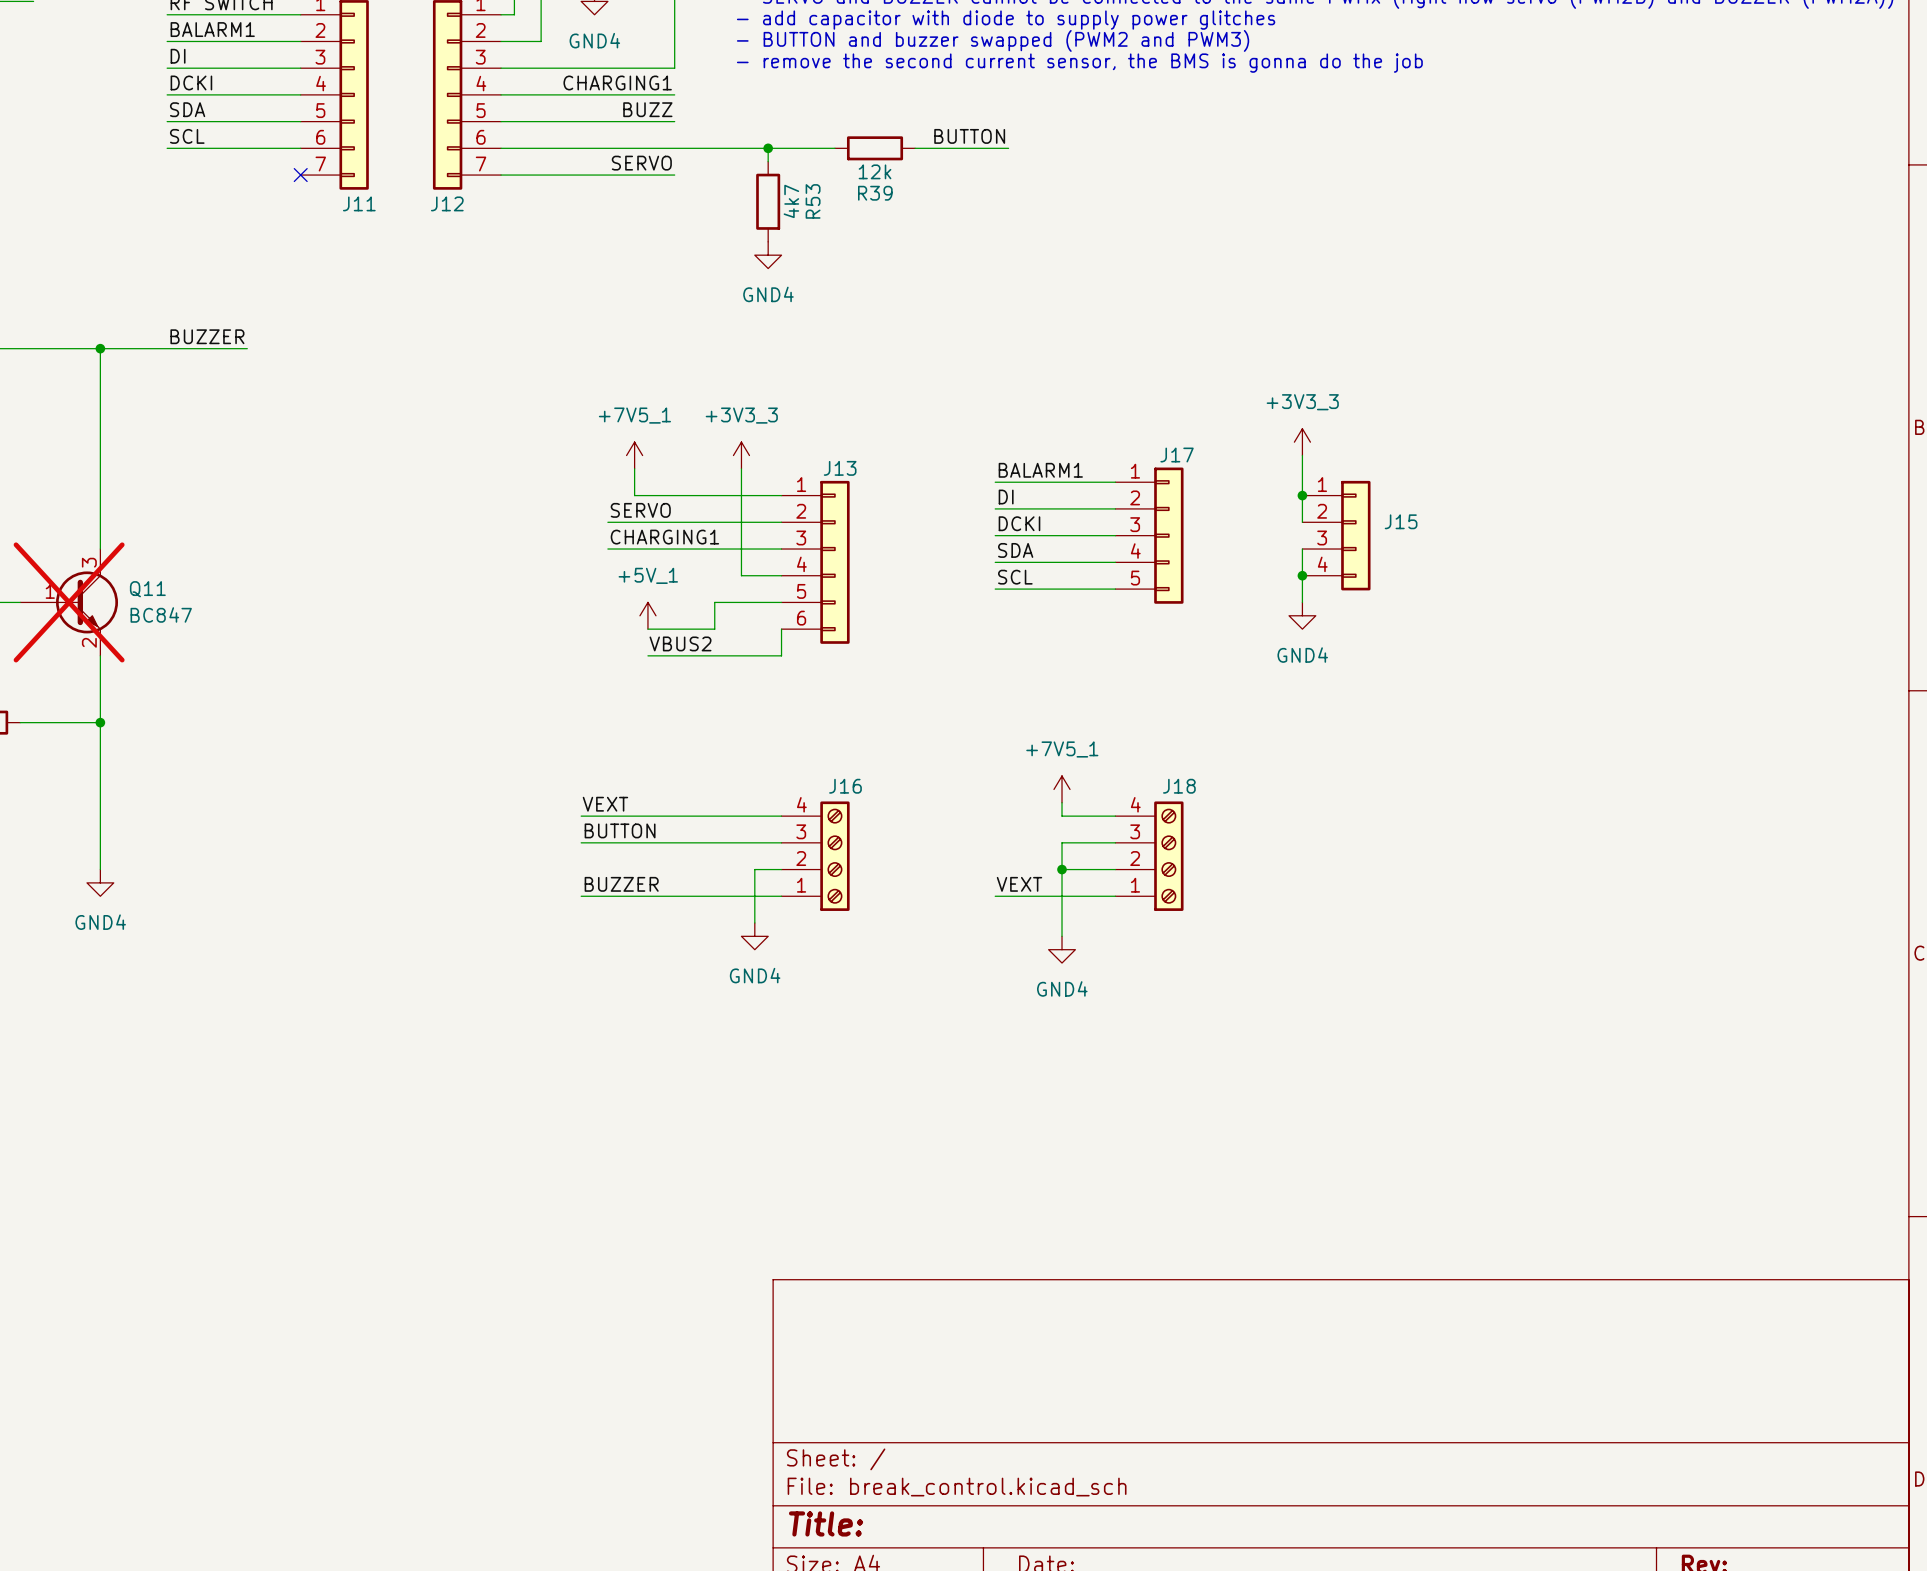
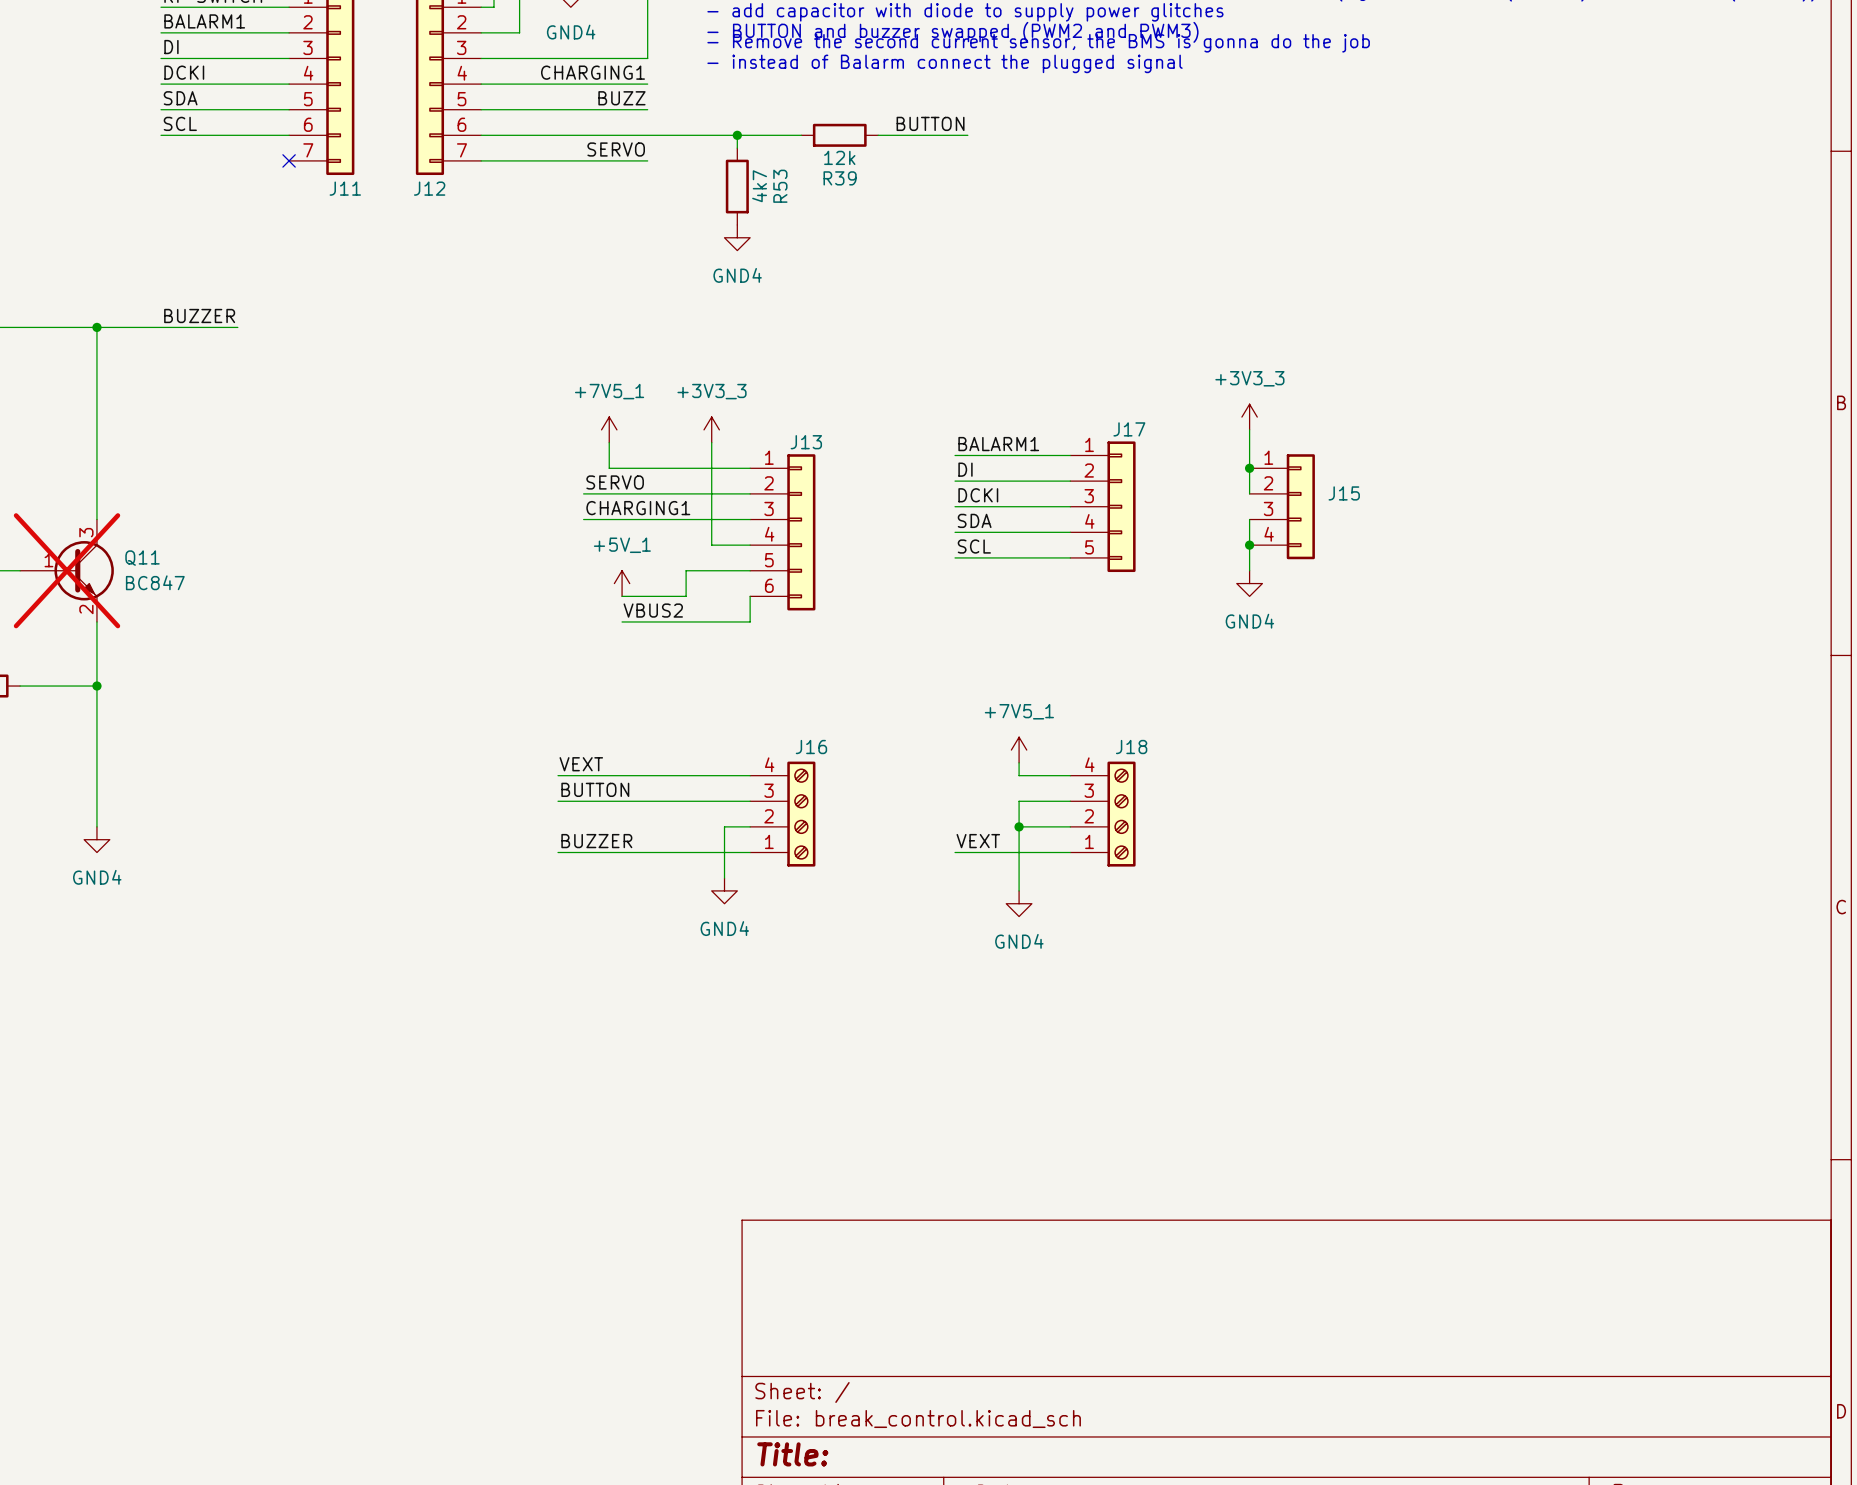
text: - remove the second current sensor, the BMS is gonna do the job (1079, 63) -> - Remove the second current sensor, the BMS is gonna do the job (1038, 43)
text: none -> - instead of Balarm connect the plugged signal (945, 63)

